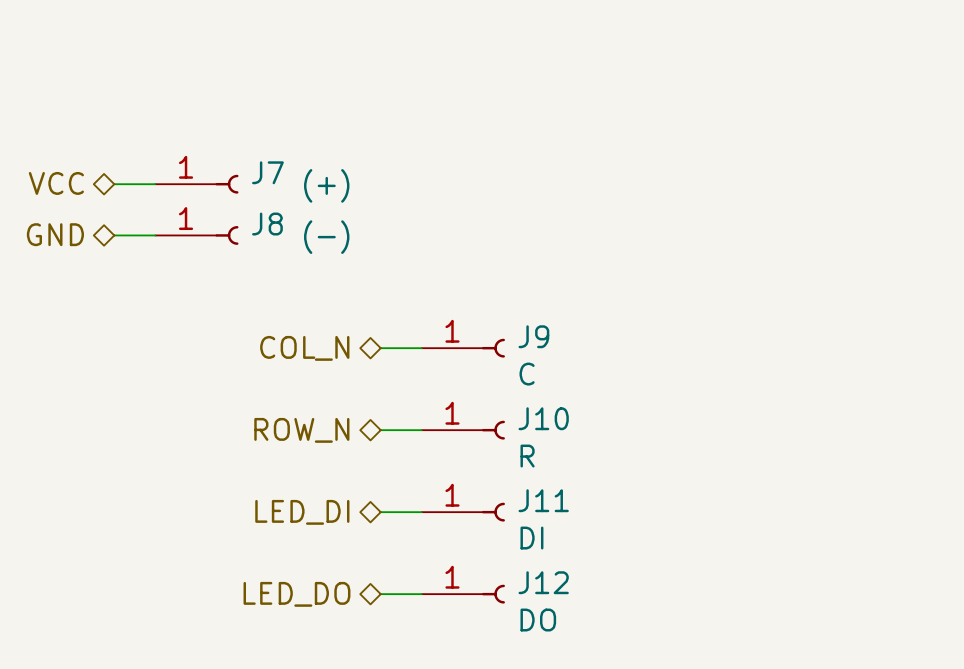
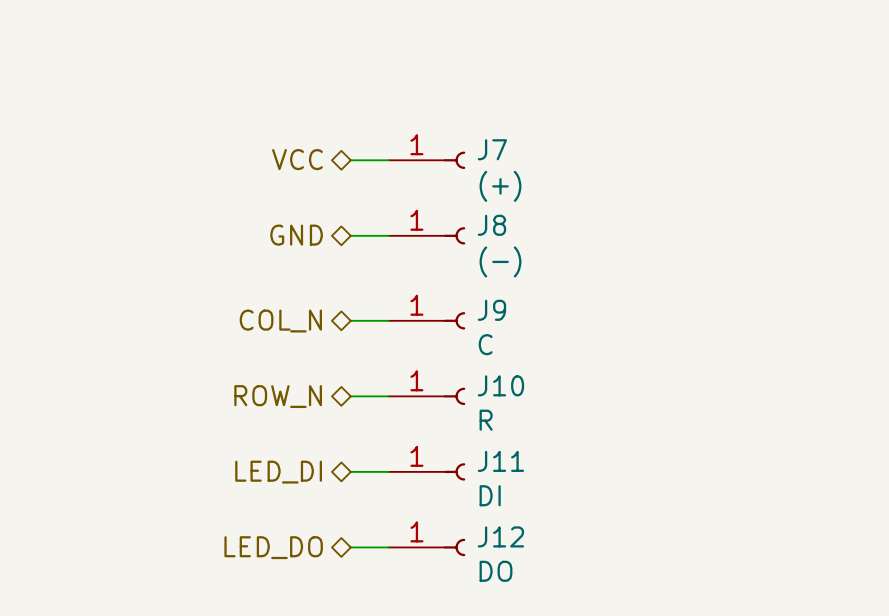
hierarchical label position: VCC (56, 183) -> VCC (297, 159)
wire: (114, 184) (155, 184) -> (350, 160) (388, 160)
J7 position: (196, 184) -> (426, 160)
J7 value position: (+) (326, 185) -> (+) (500, 186)
hierarchical label position: GND (55, 234) -> GND (296, 235)
wire: (114, 235) (155, 235) -> (350, 235) (388, 235)
J8 position: (196, 235) -> (426, 235)
J8 value position: (-) (326, 237) -> (-) (500, 261)

